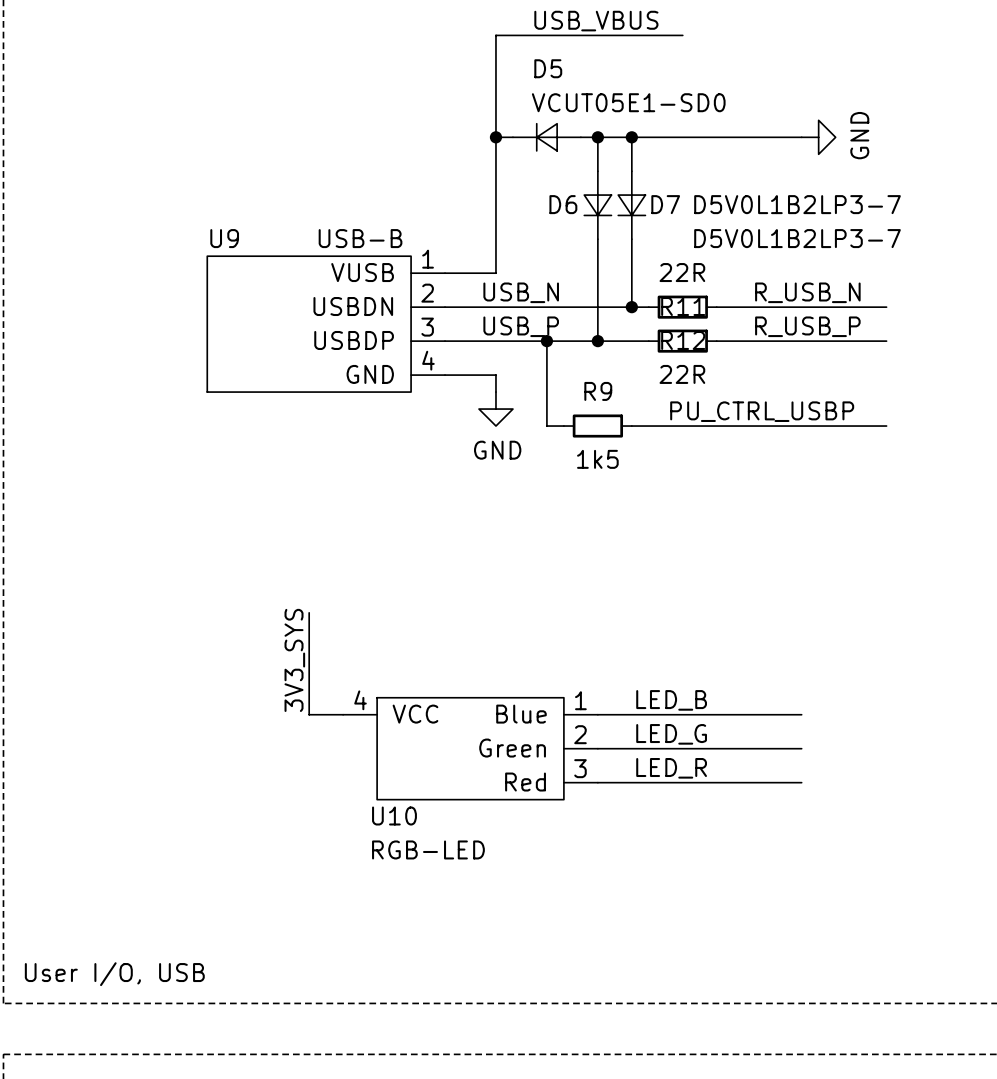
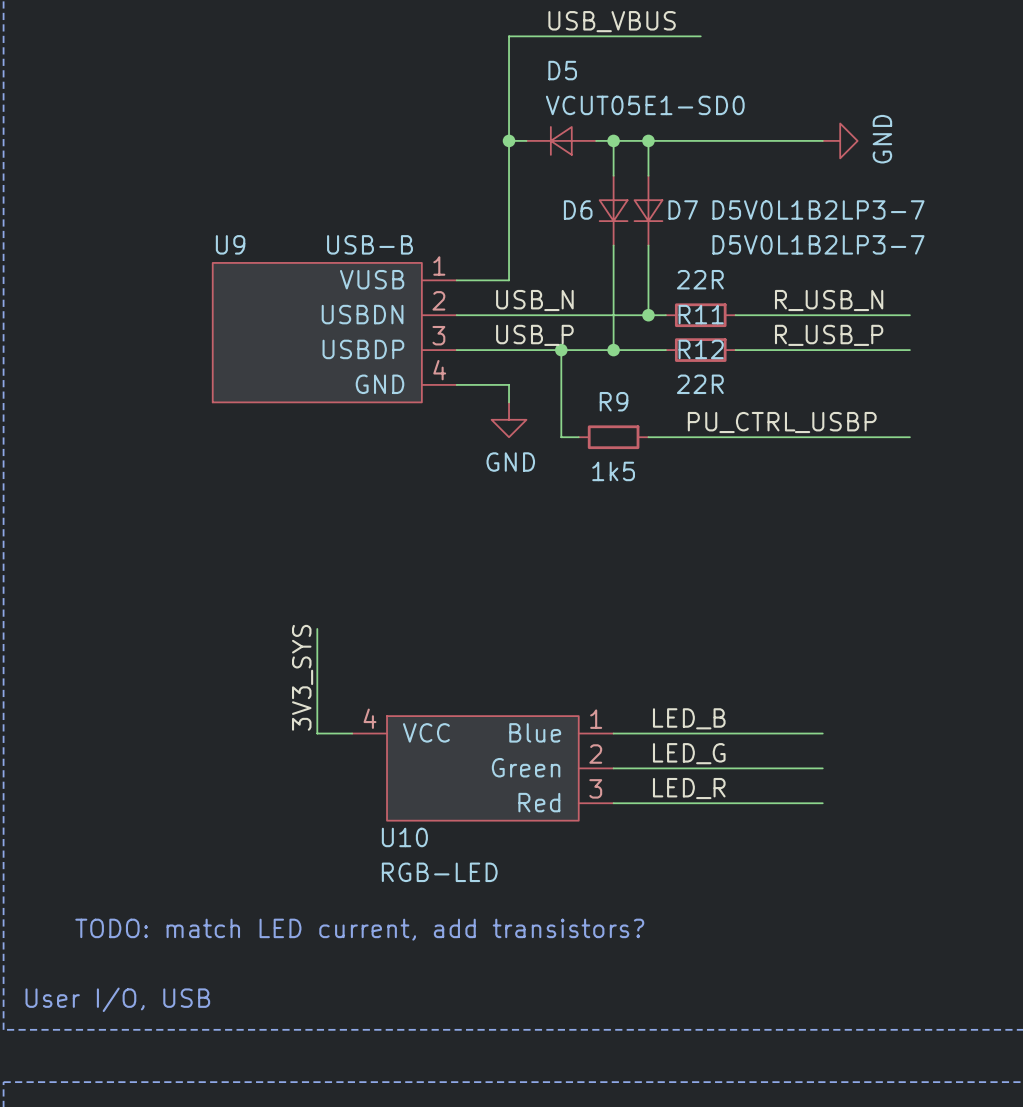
text: none -> TODO: match LED current, add transistors? (359, 929)

